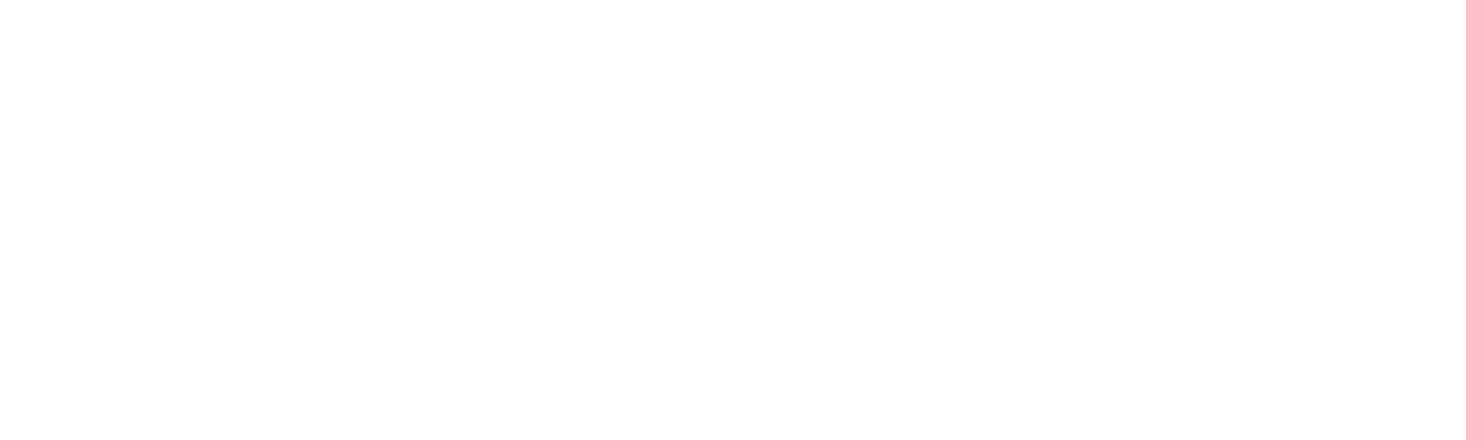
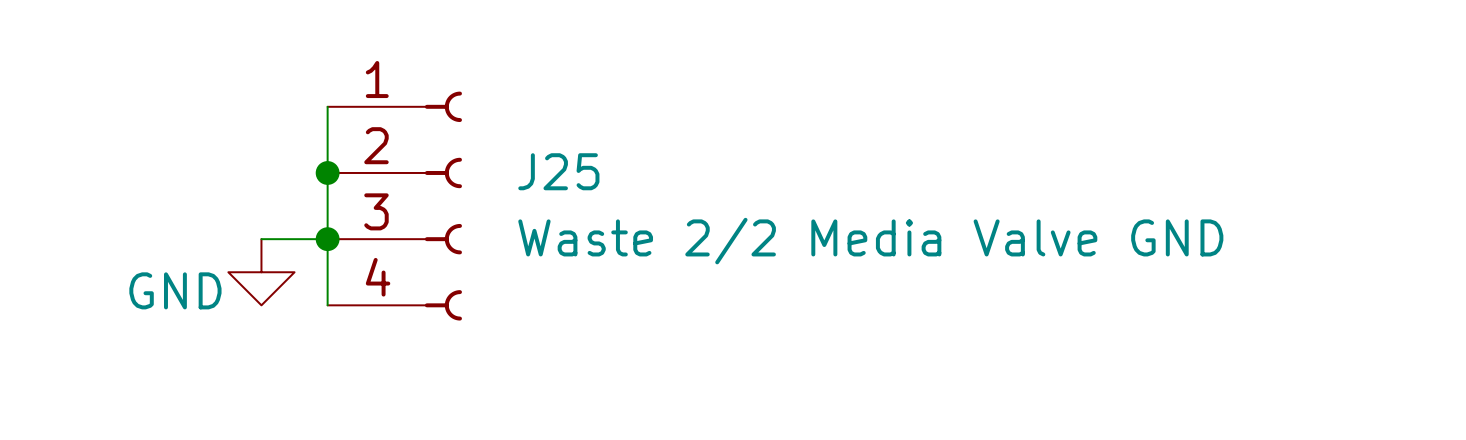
wire: none -> (327, 106) (327, 305)
junction: none -> (327, 172)
J25: none -> Waste 2/2 Media Valve GND (394, 206)
wire: none -> (261, 239) (327, 239)
junction: none -> (327, 239)
power symbol: none -> GND (261, 272)

